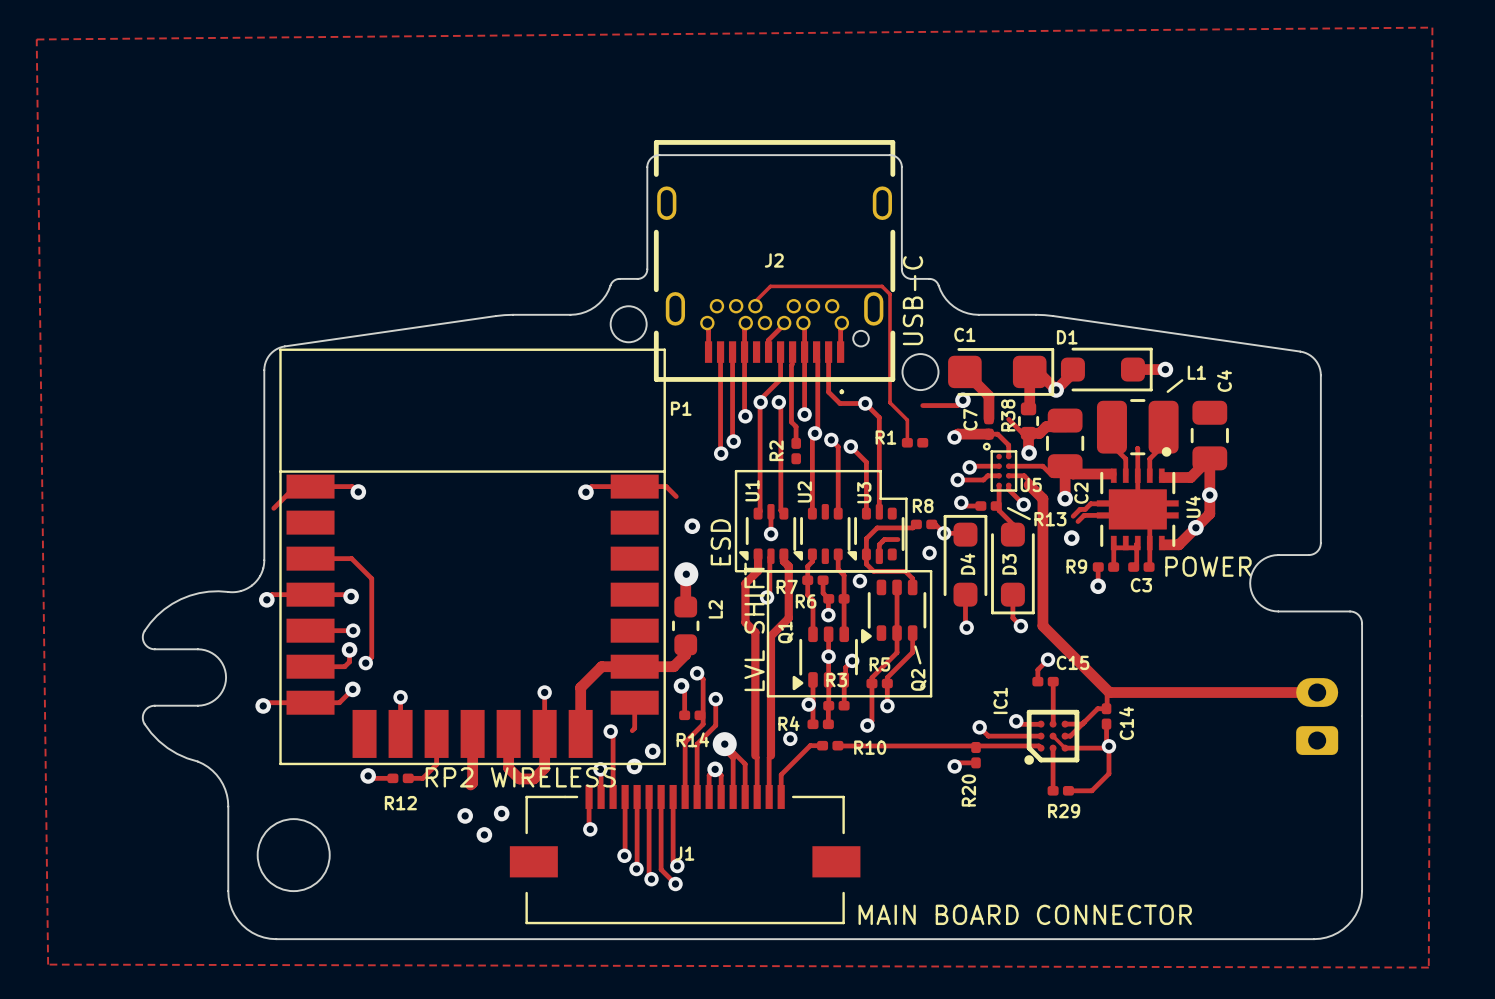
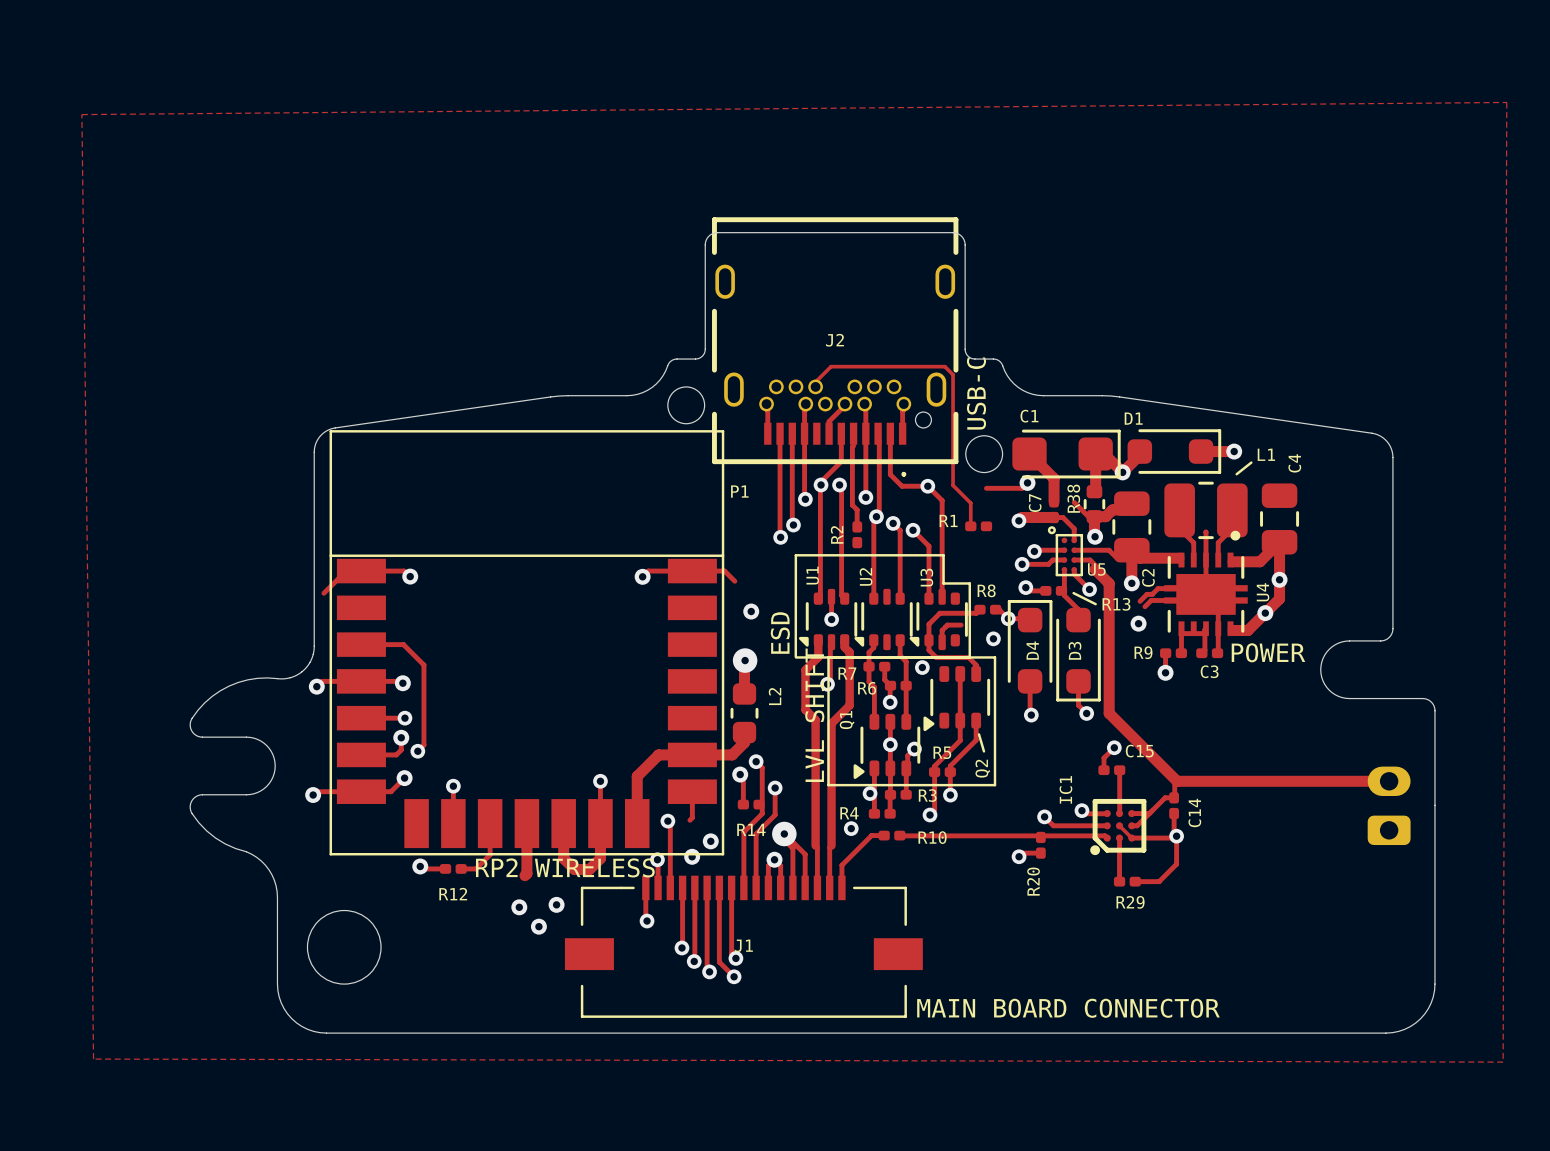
R3 name position: R3 (836, 680) -> R3 (927, 795)

